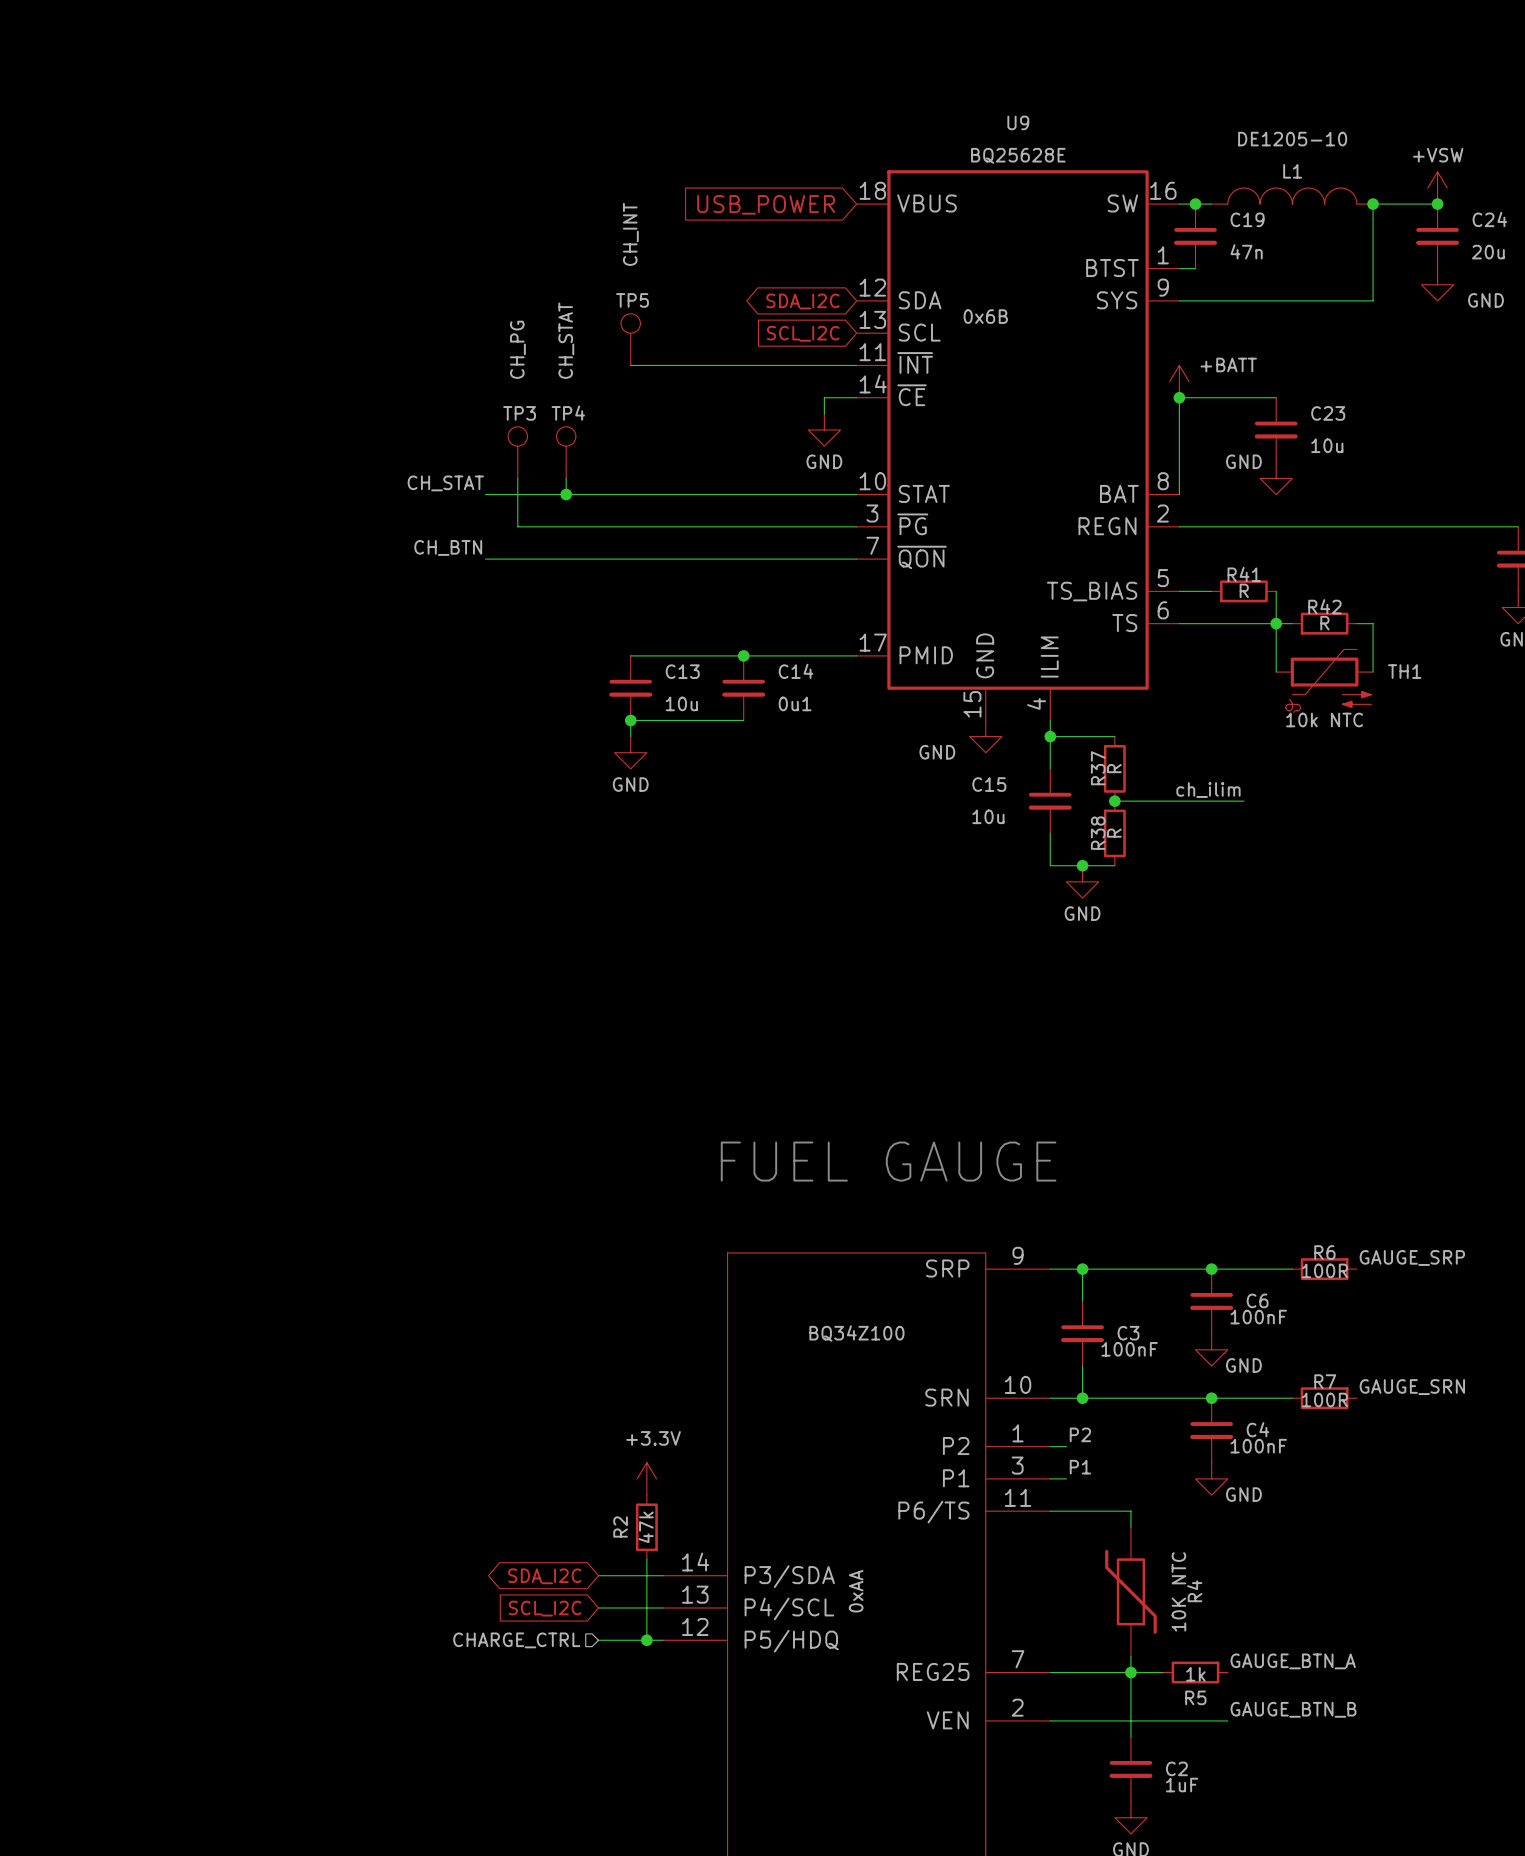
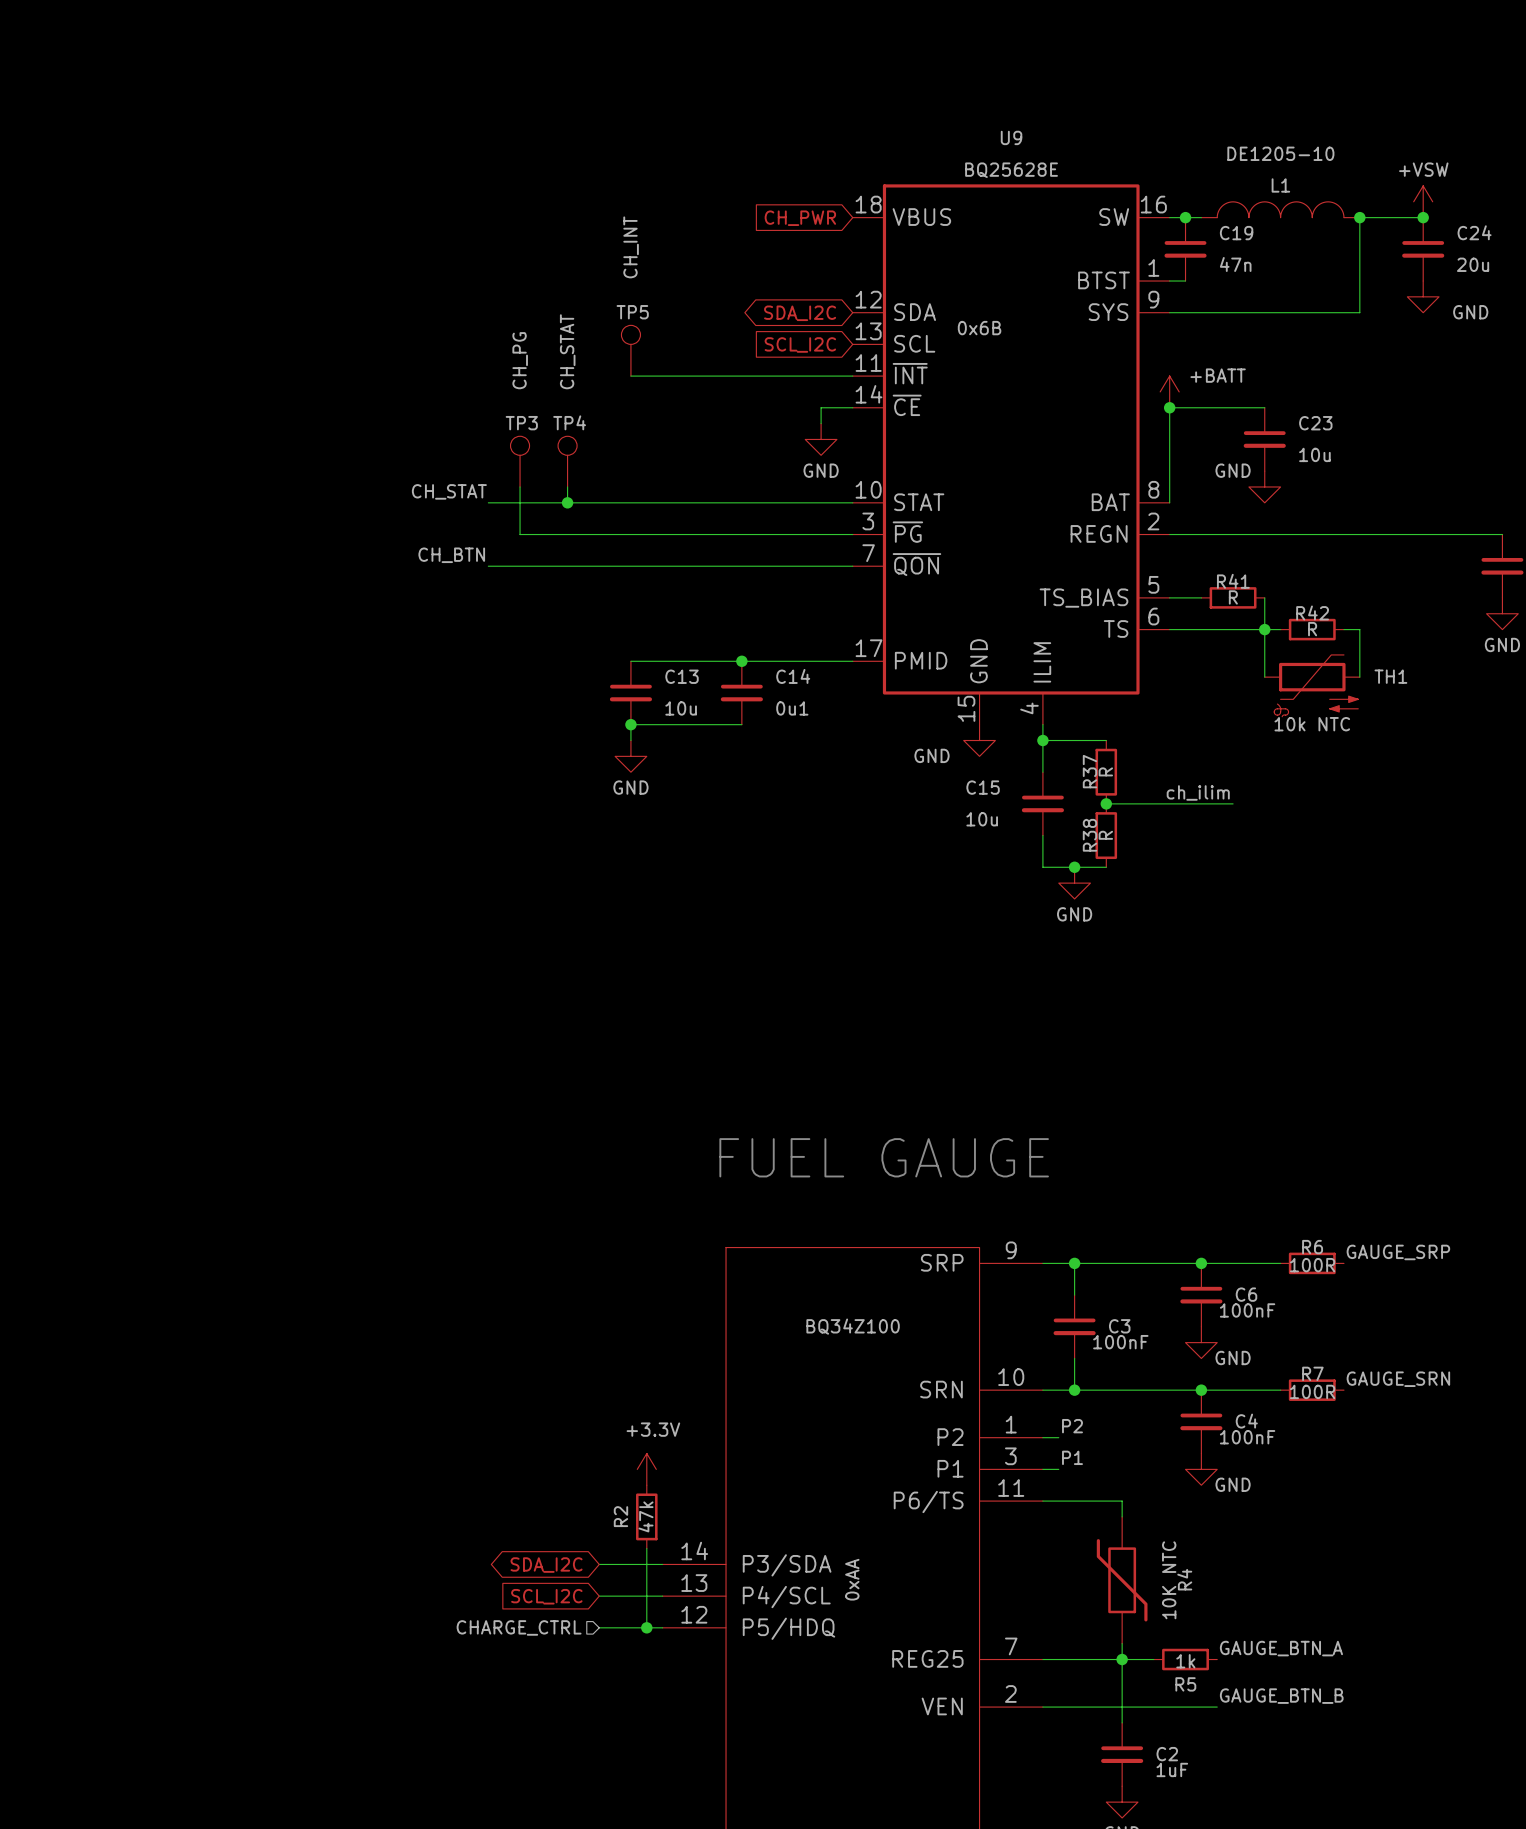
global label: USB_POWER (766, 204) -> CH_PWR (800, 218)

